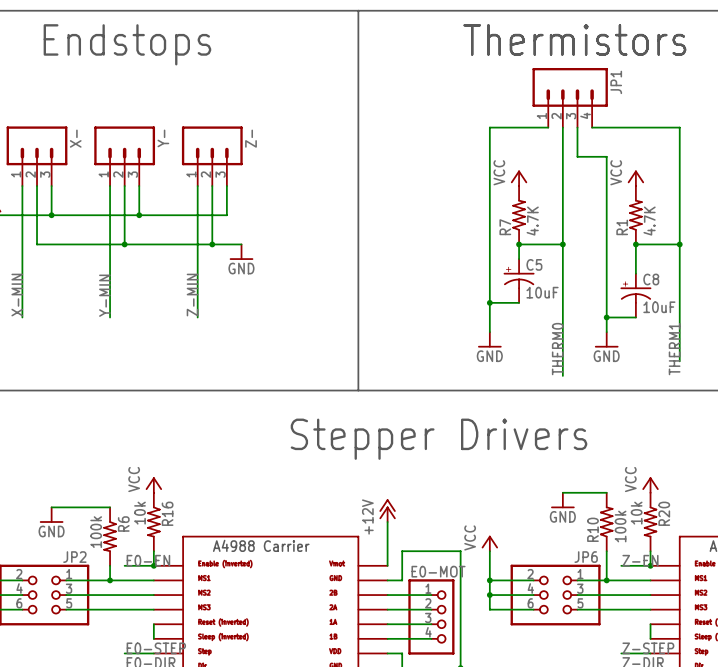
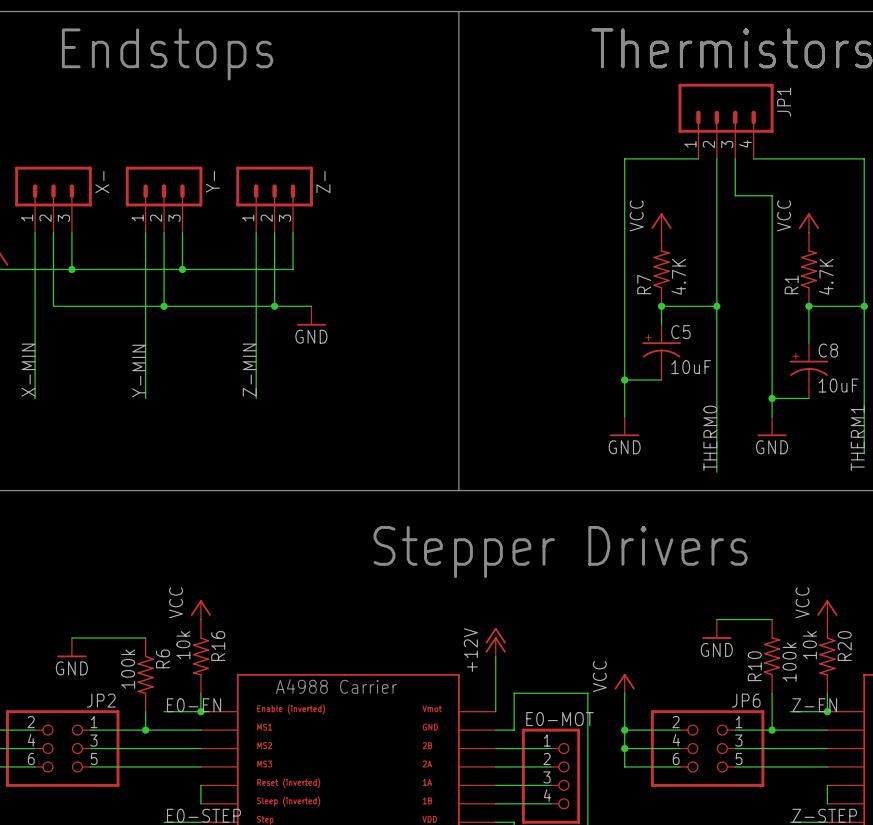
X- symbol: [6, 126, 68, 187] -> [15, 166, 92, 233]
Y- symbol: [94, 126, 156, 187] -> [125, 166, 203, 233]
Z- symbol: [181, 126, 243, 187] -> [236, 166, 313, 233]

